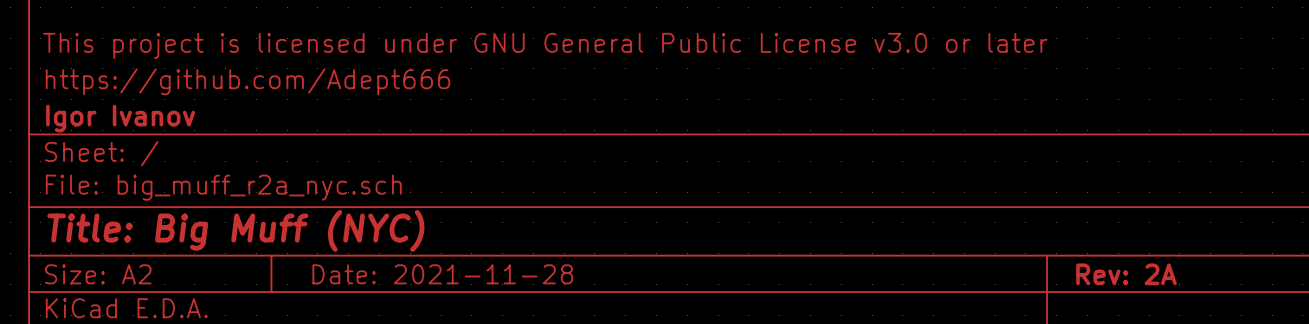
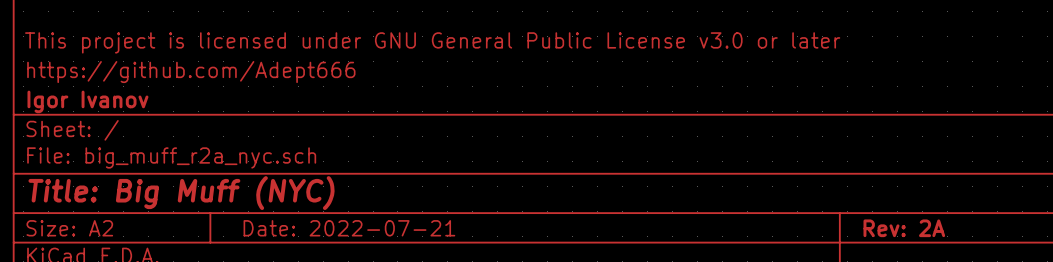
title block: Date: 2021-11-28 (442, 274) -> Date: 2022-07-21 (349, 228)

